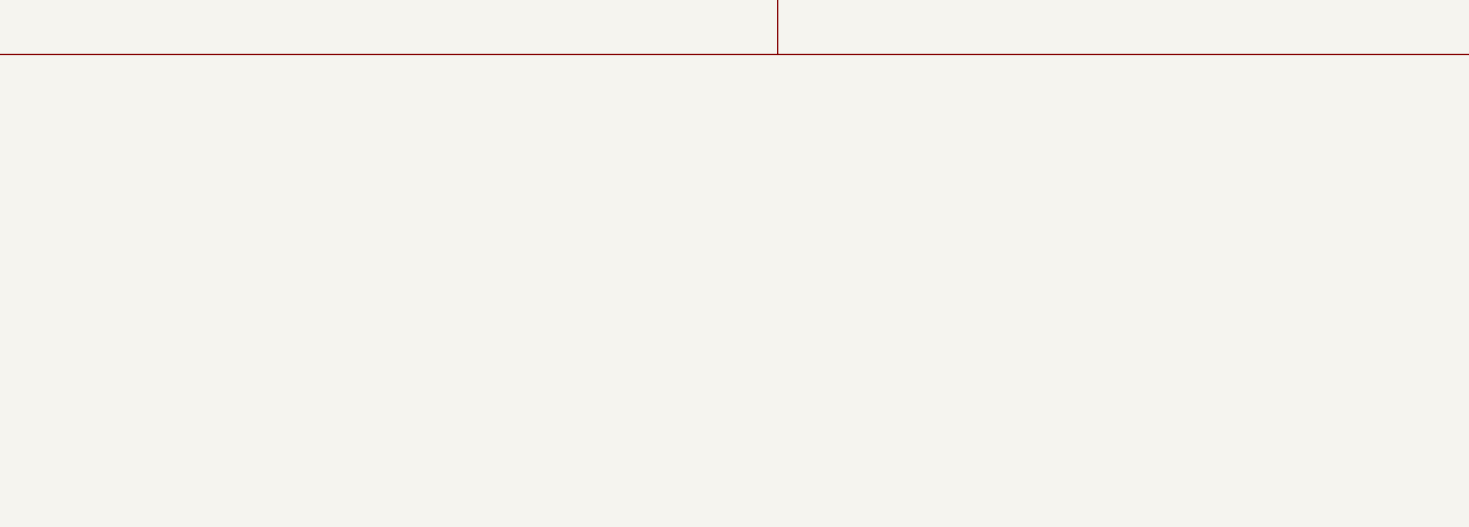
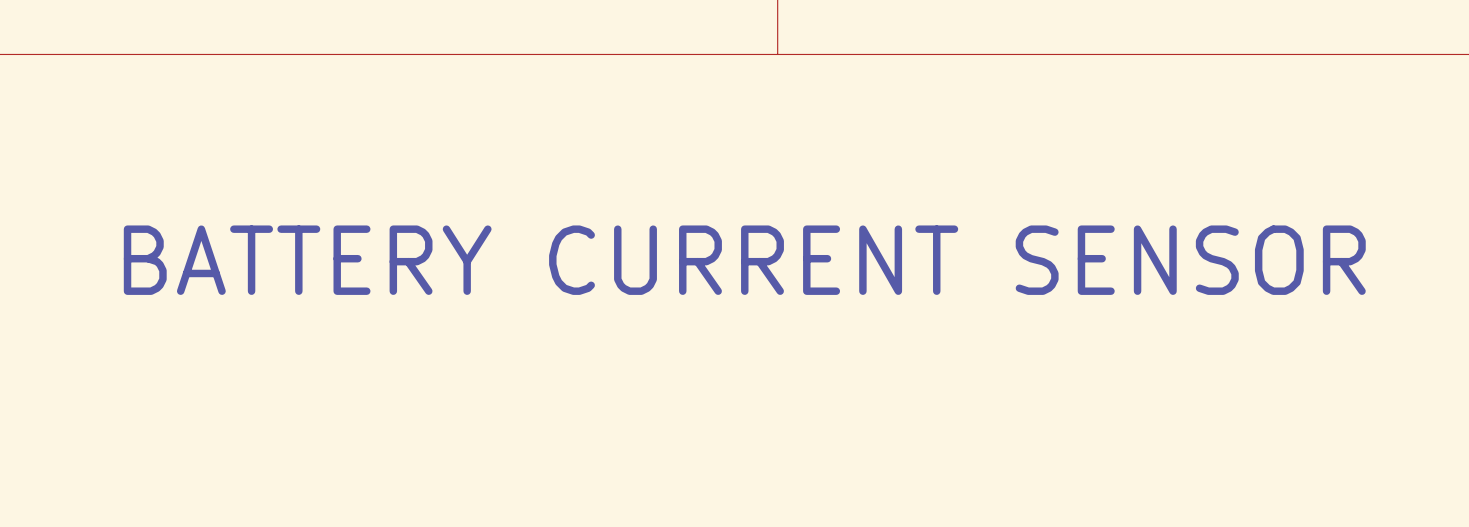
text: none -> BATTERY CURRENT SENSOR (744, 260)

